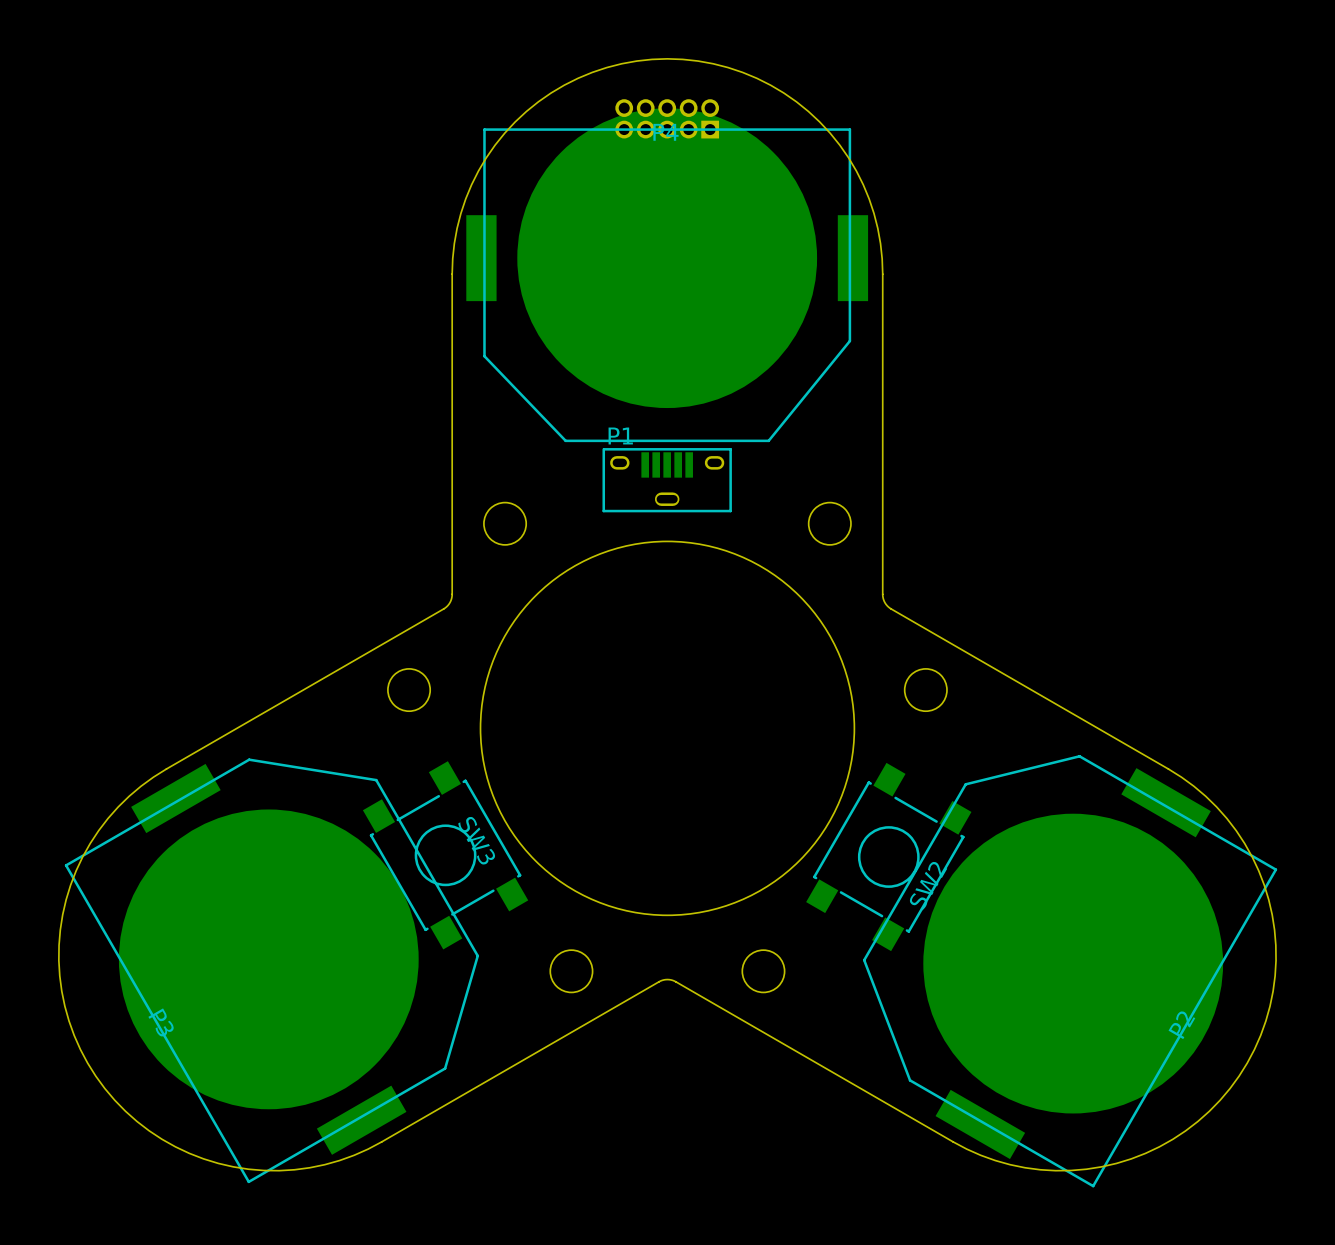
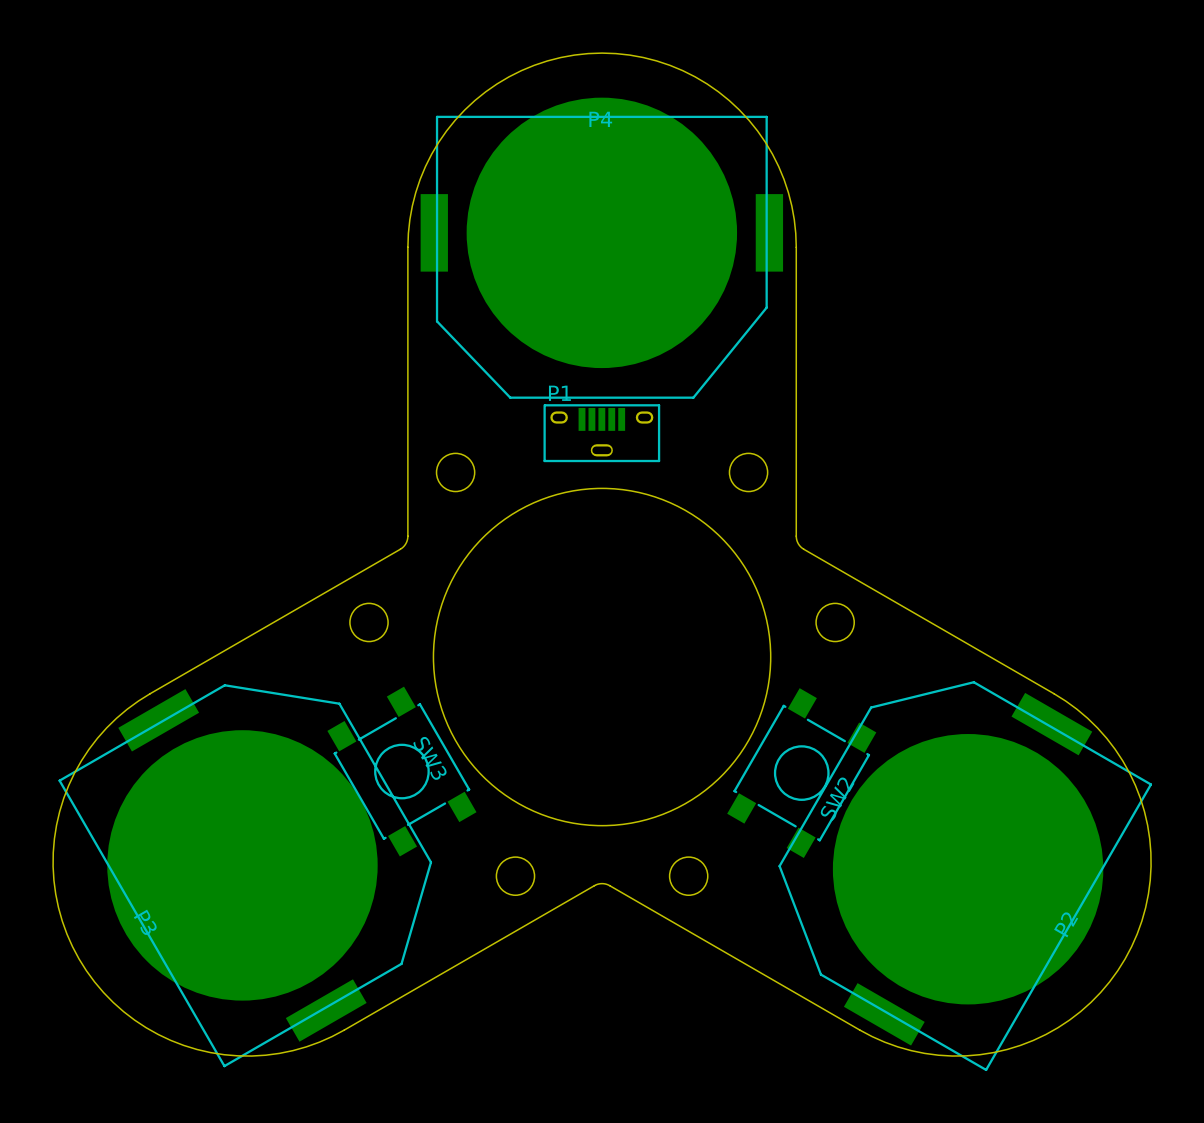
part: (667, 118) -> none

